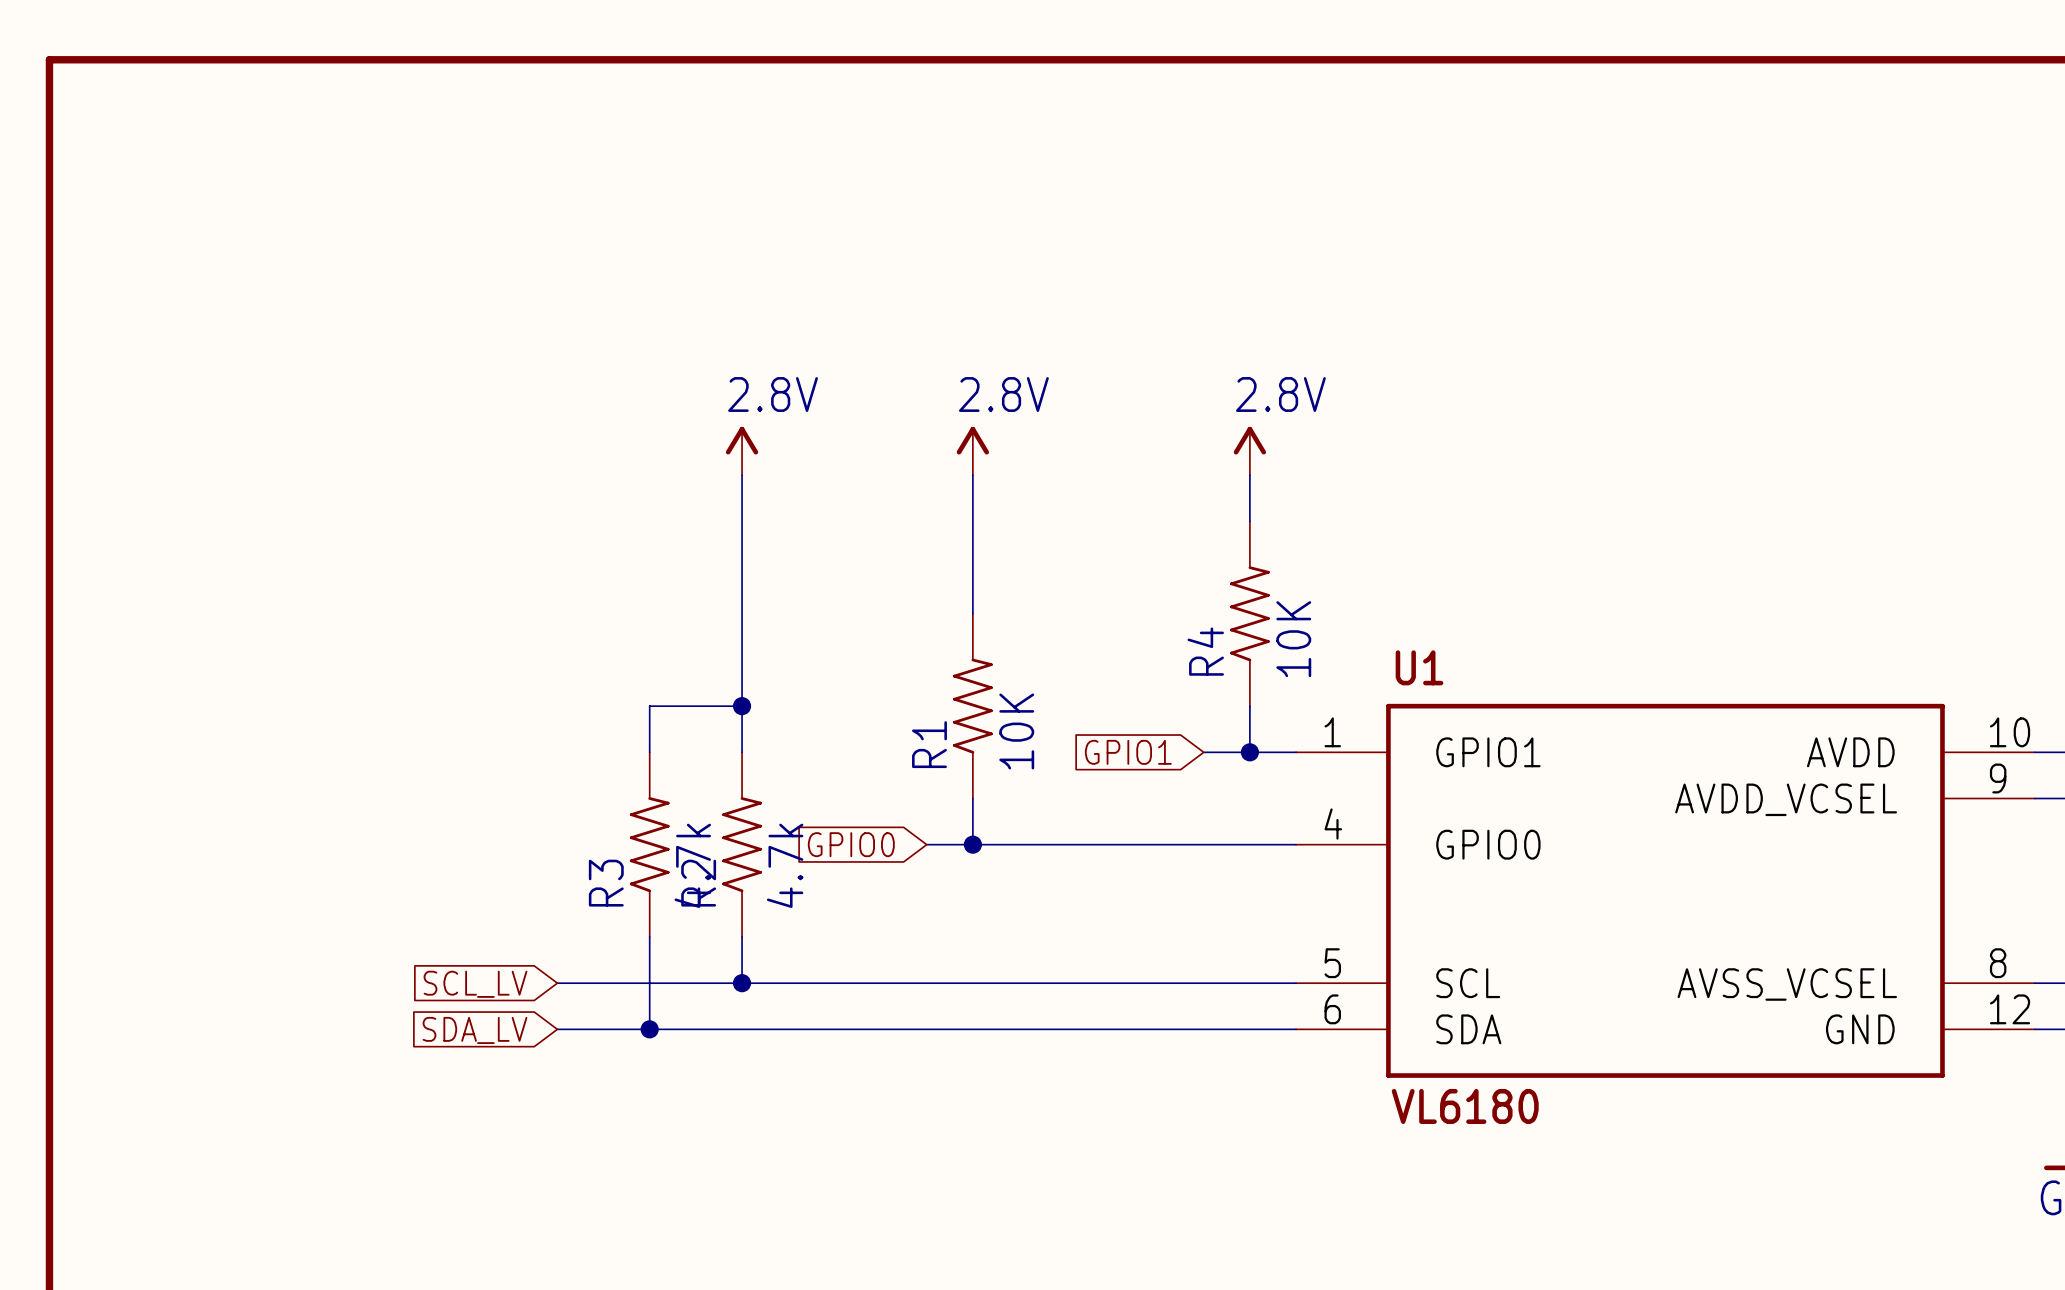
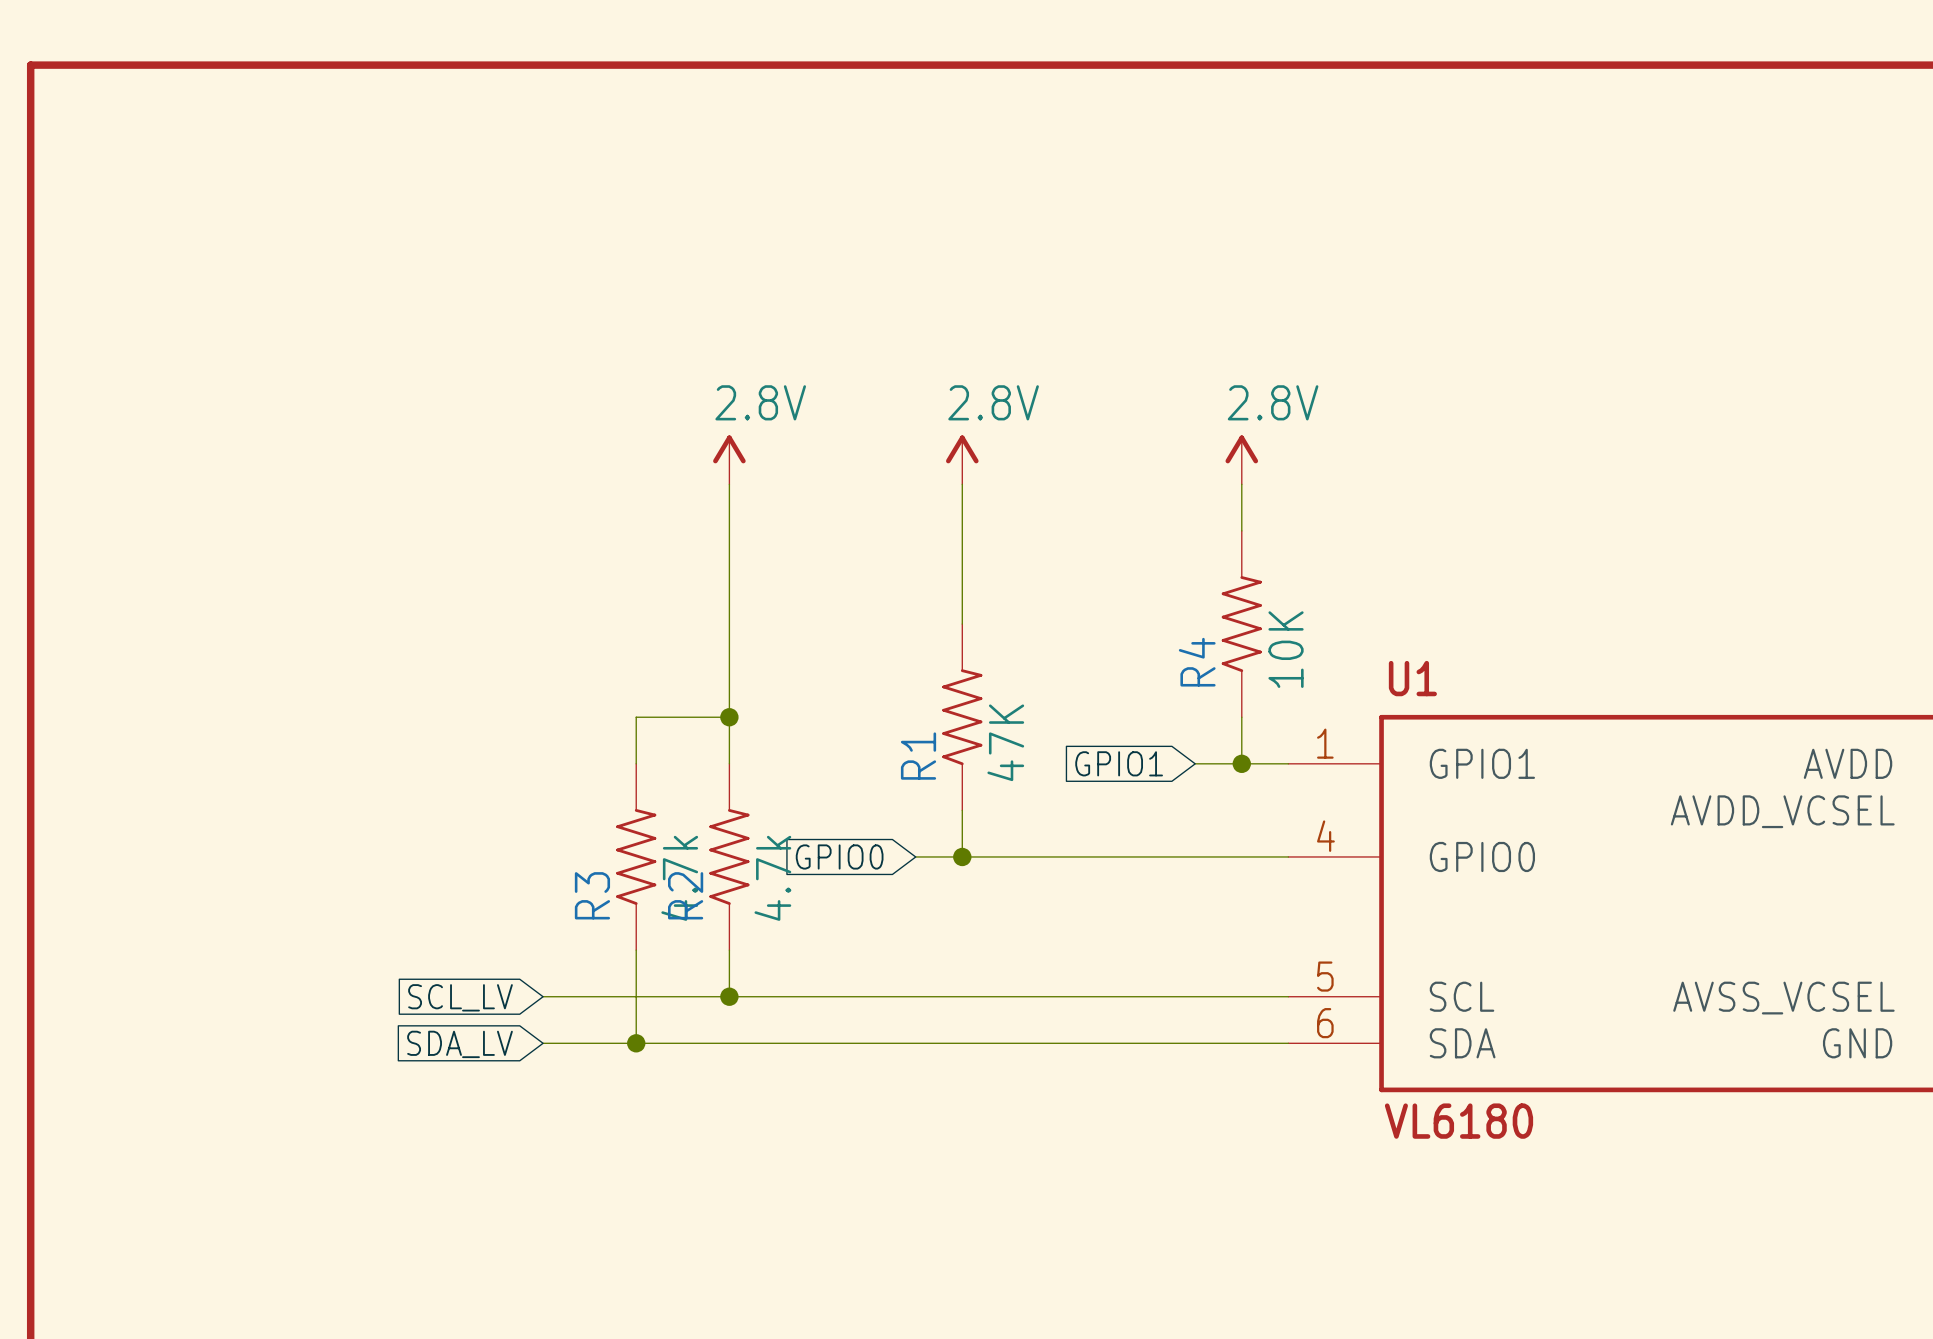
R1 value: 10K (1016, 731) -> 47K (1005, 742)

